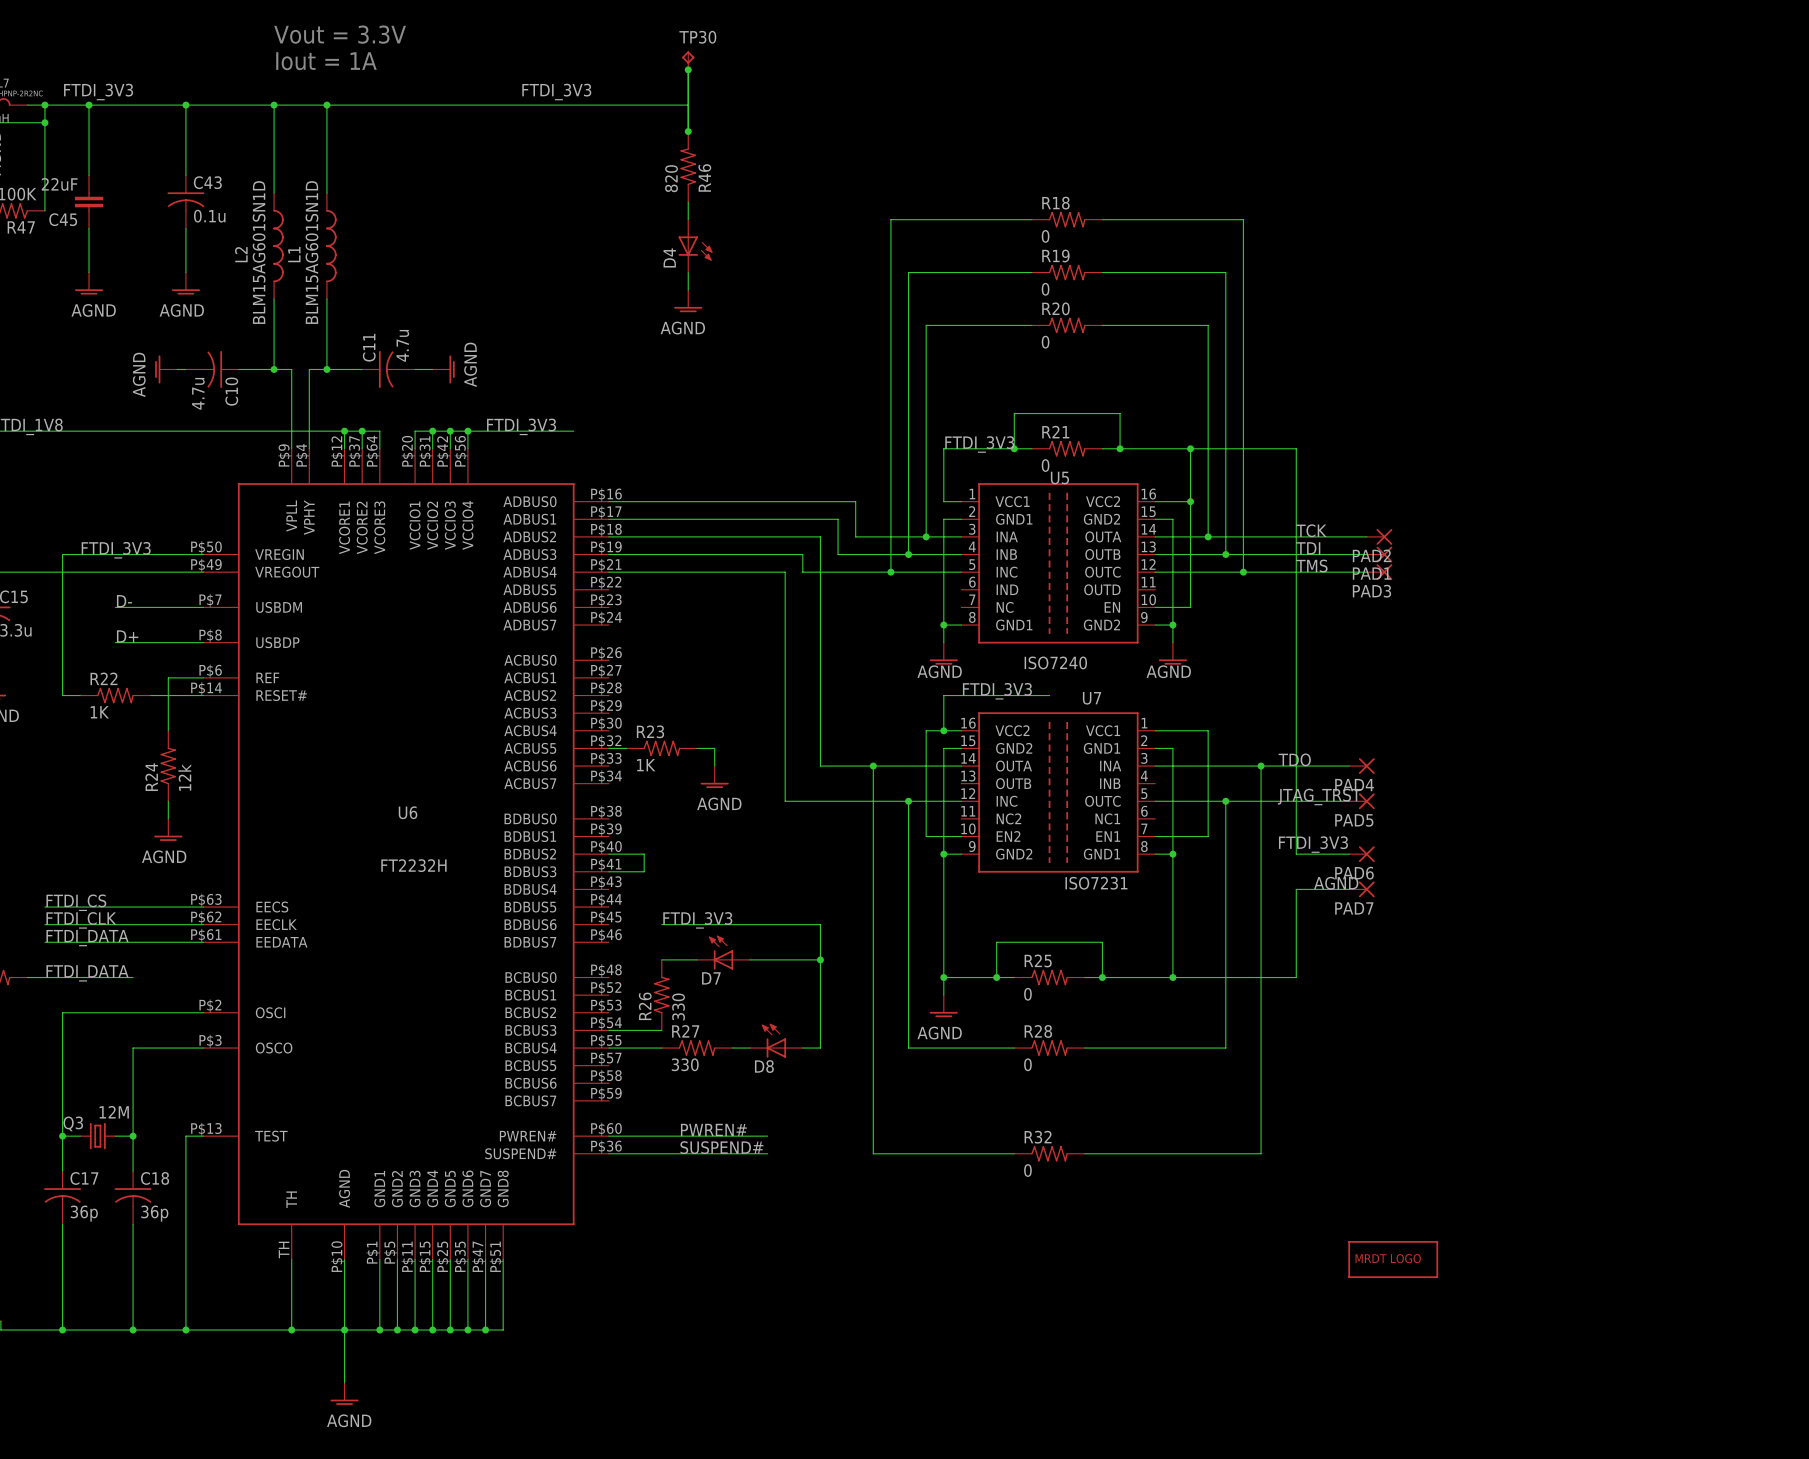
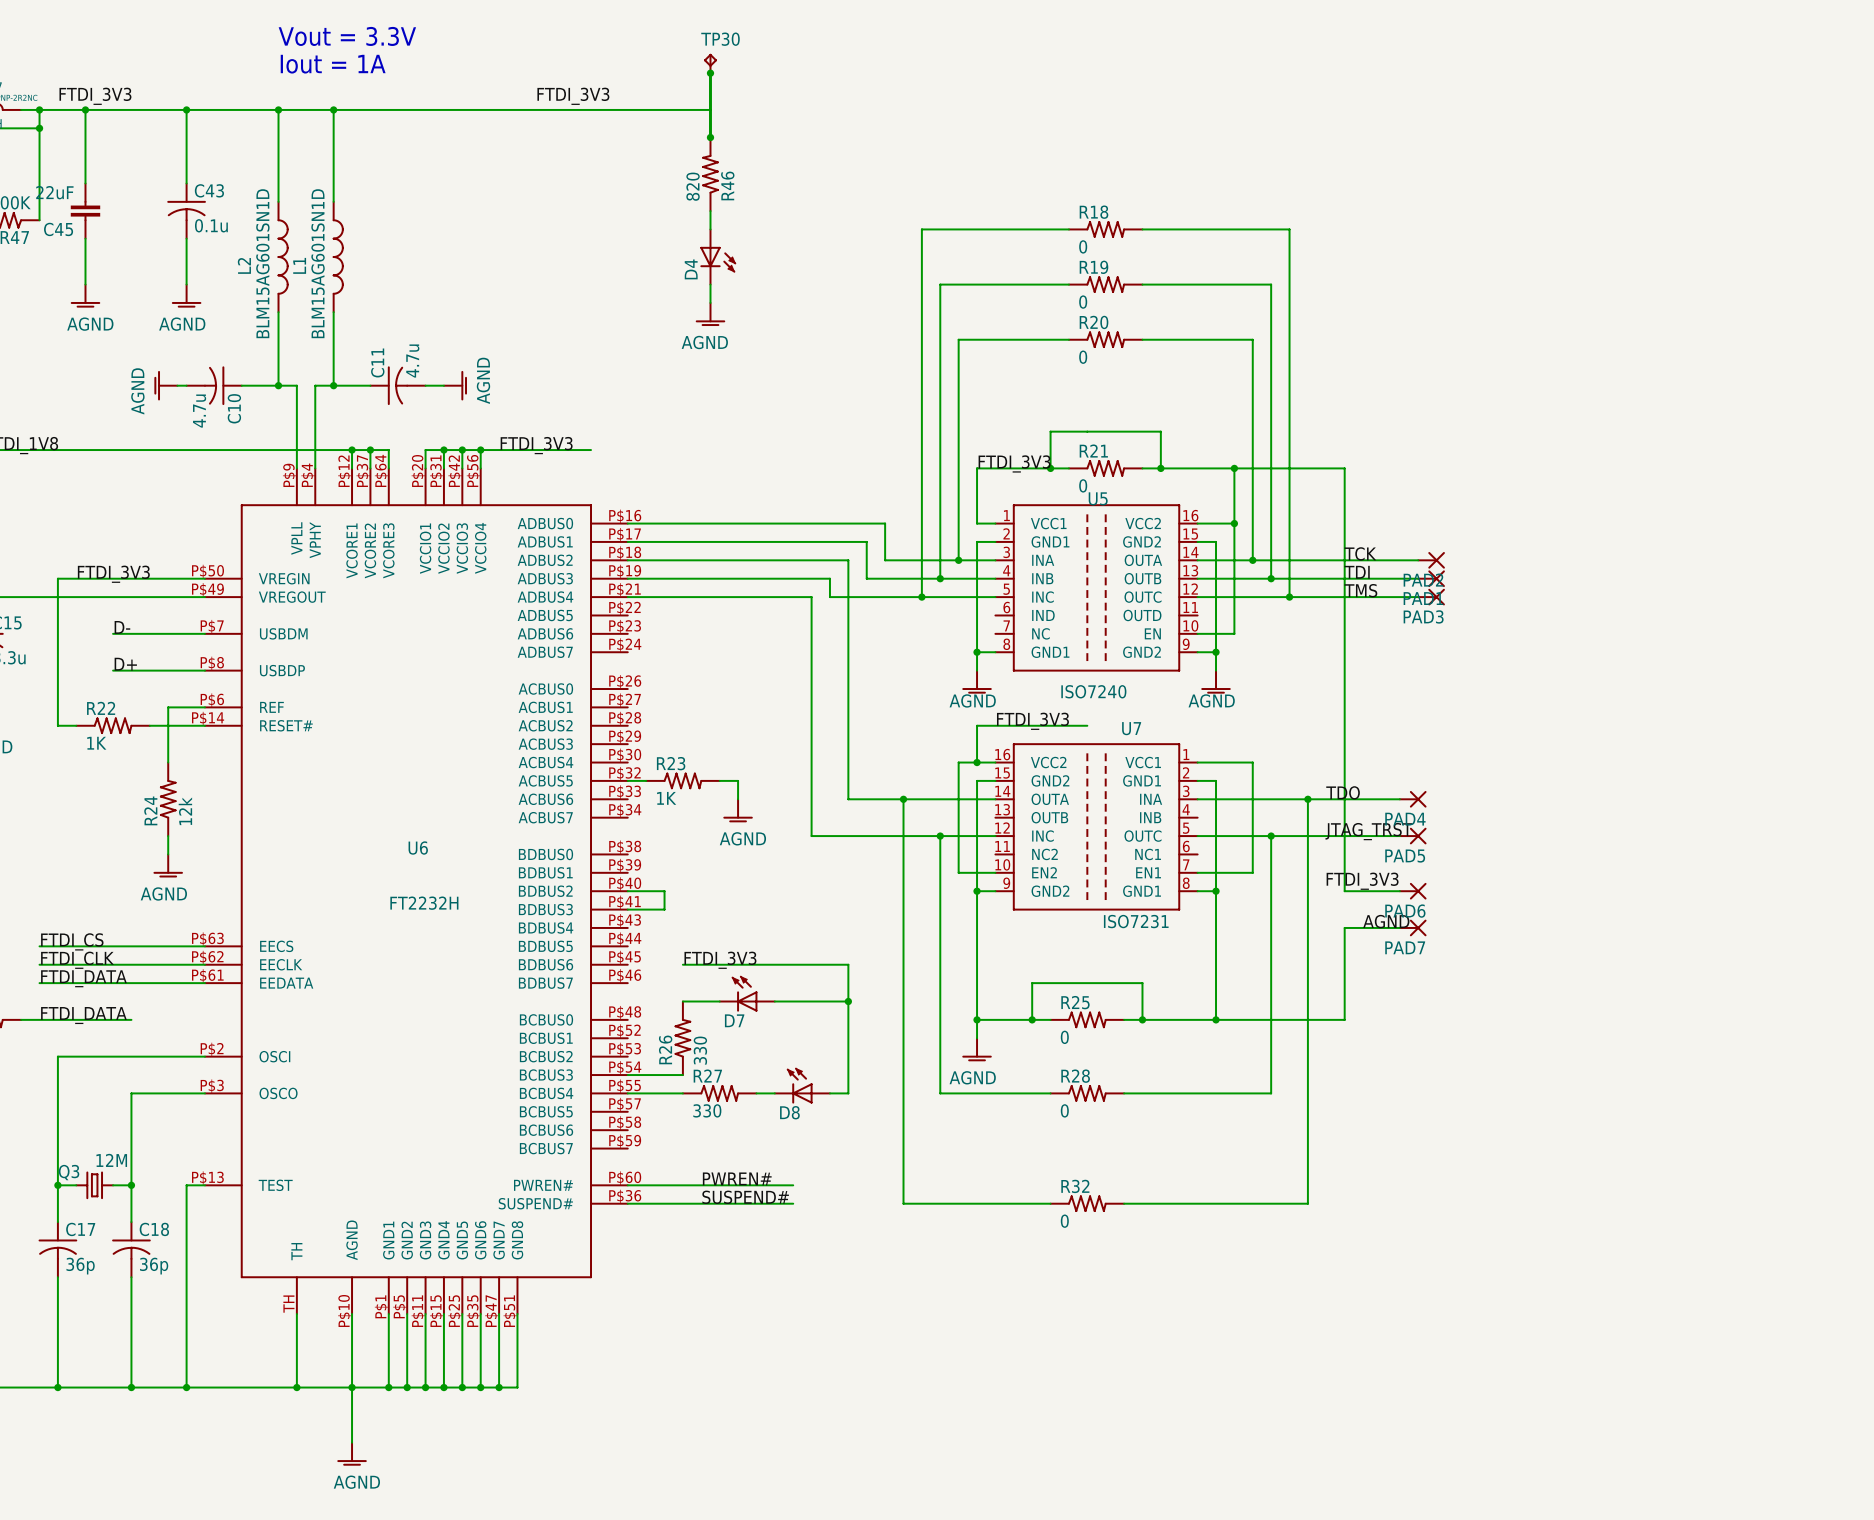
part: (1393, 1259) -> none

